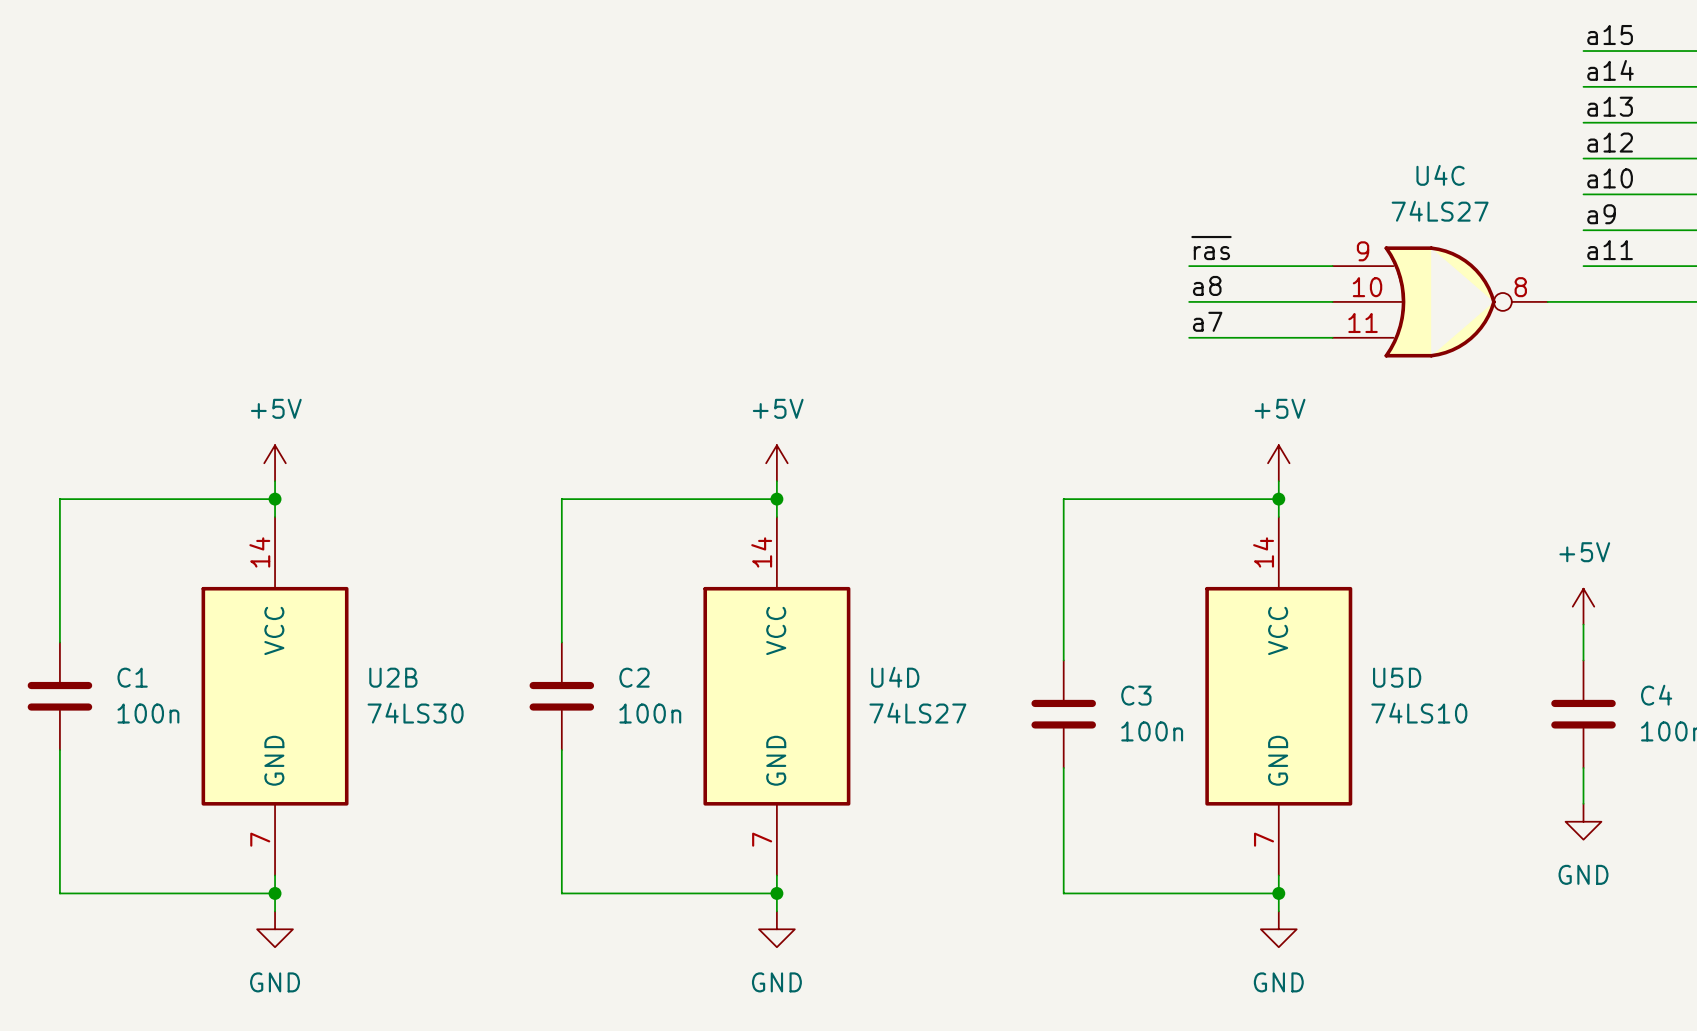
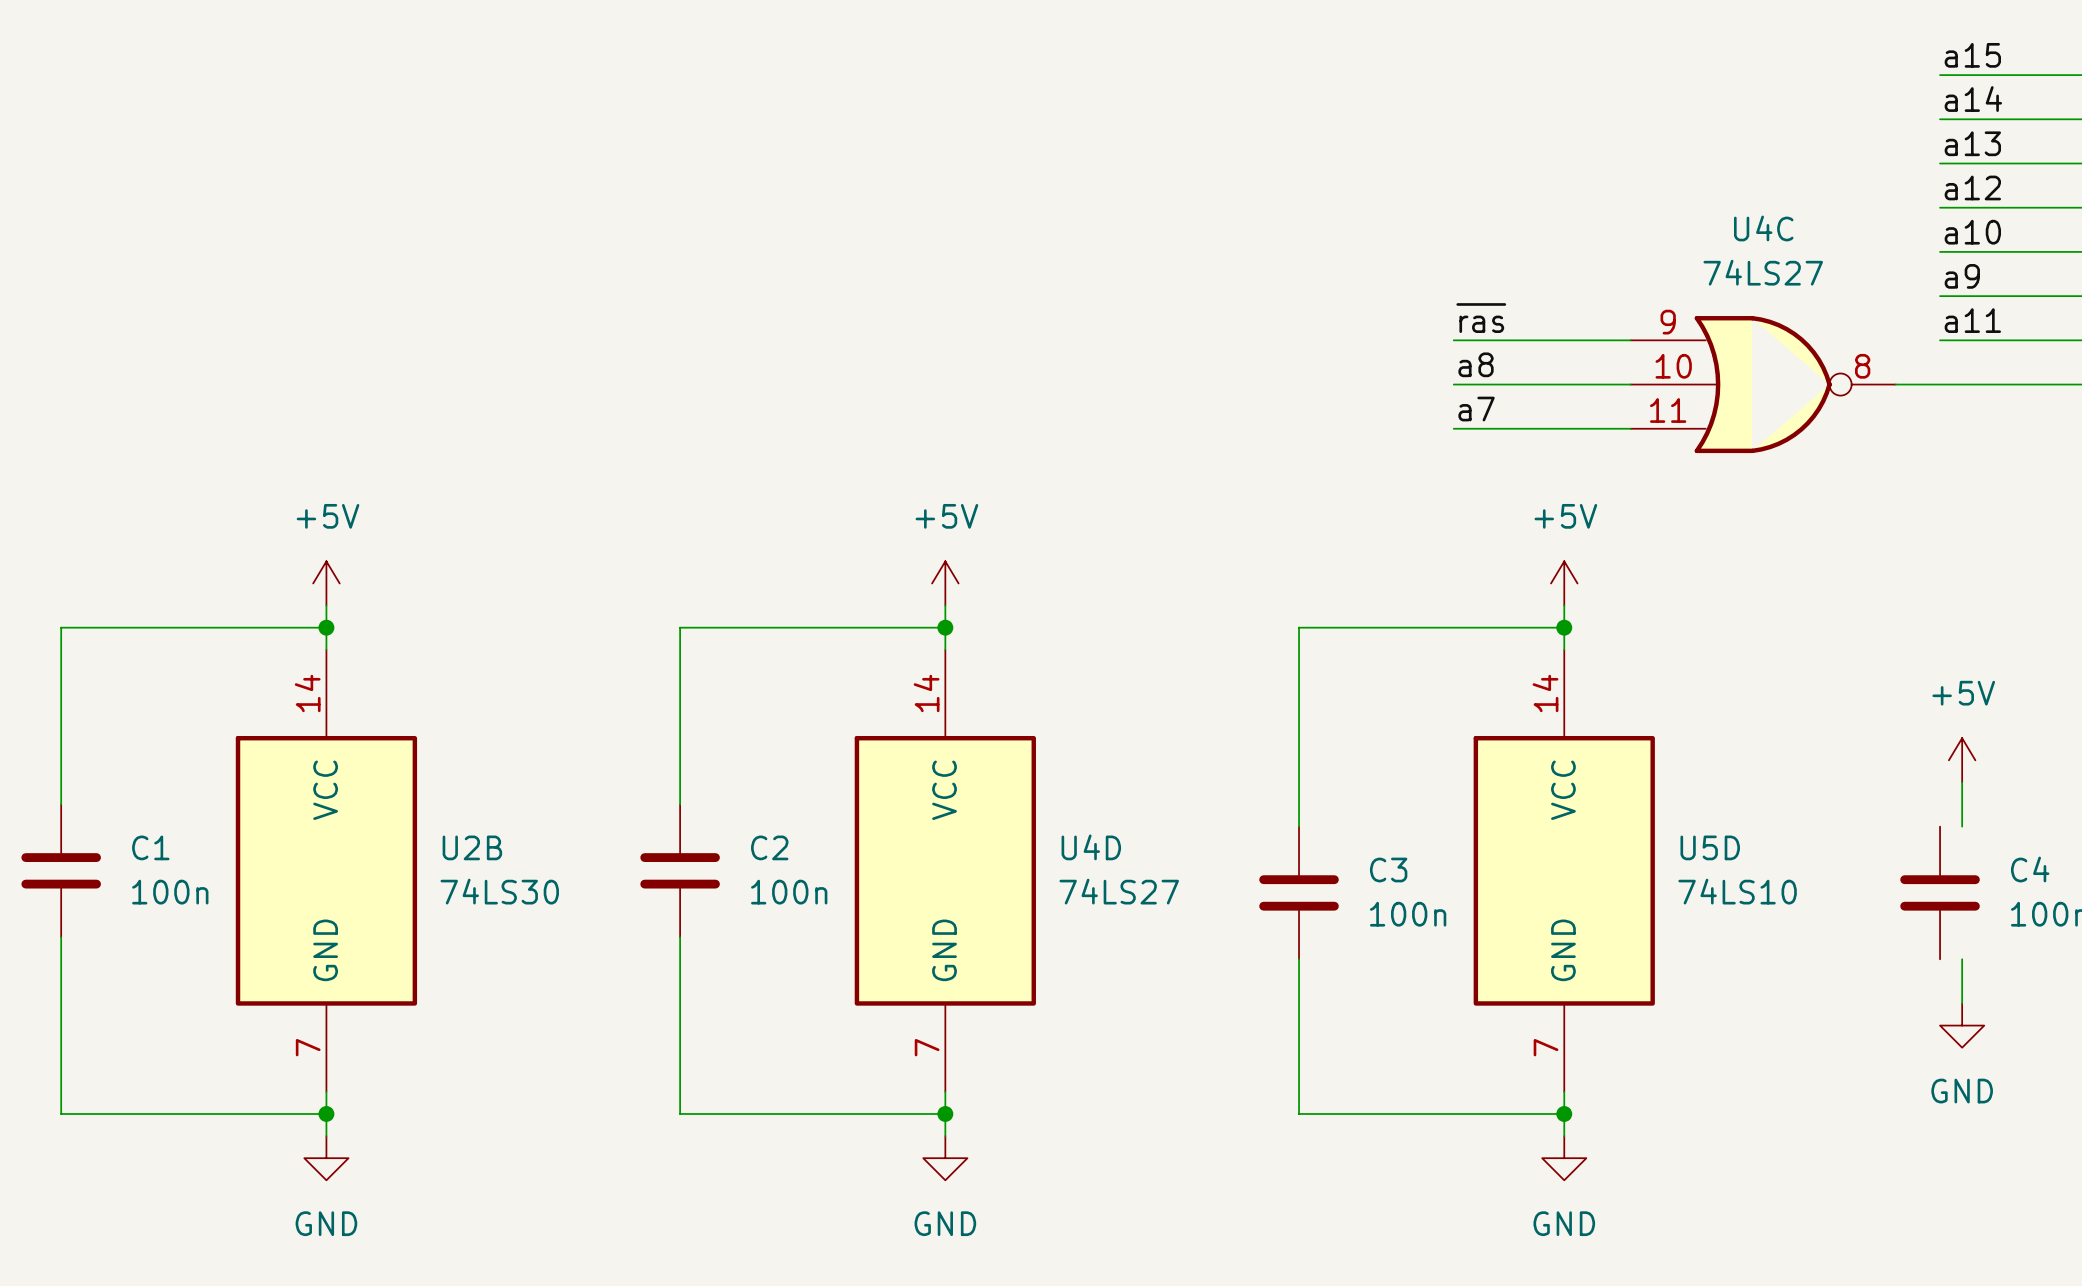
power symbol position: +5V (1583, 606) -> +5V (1962, 760)
wire: (1583, 624) (1583, 660) -> (1962, 782) (1962, 826)
wire: (1583, 767) (1583, 803) -> (1962, 959) (1962, 1003)
power symbol position: GND (1583, 821) -> GND (1962, 1025)

